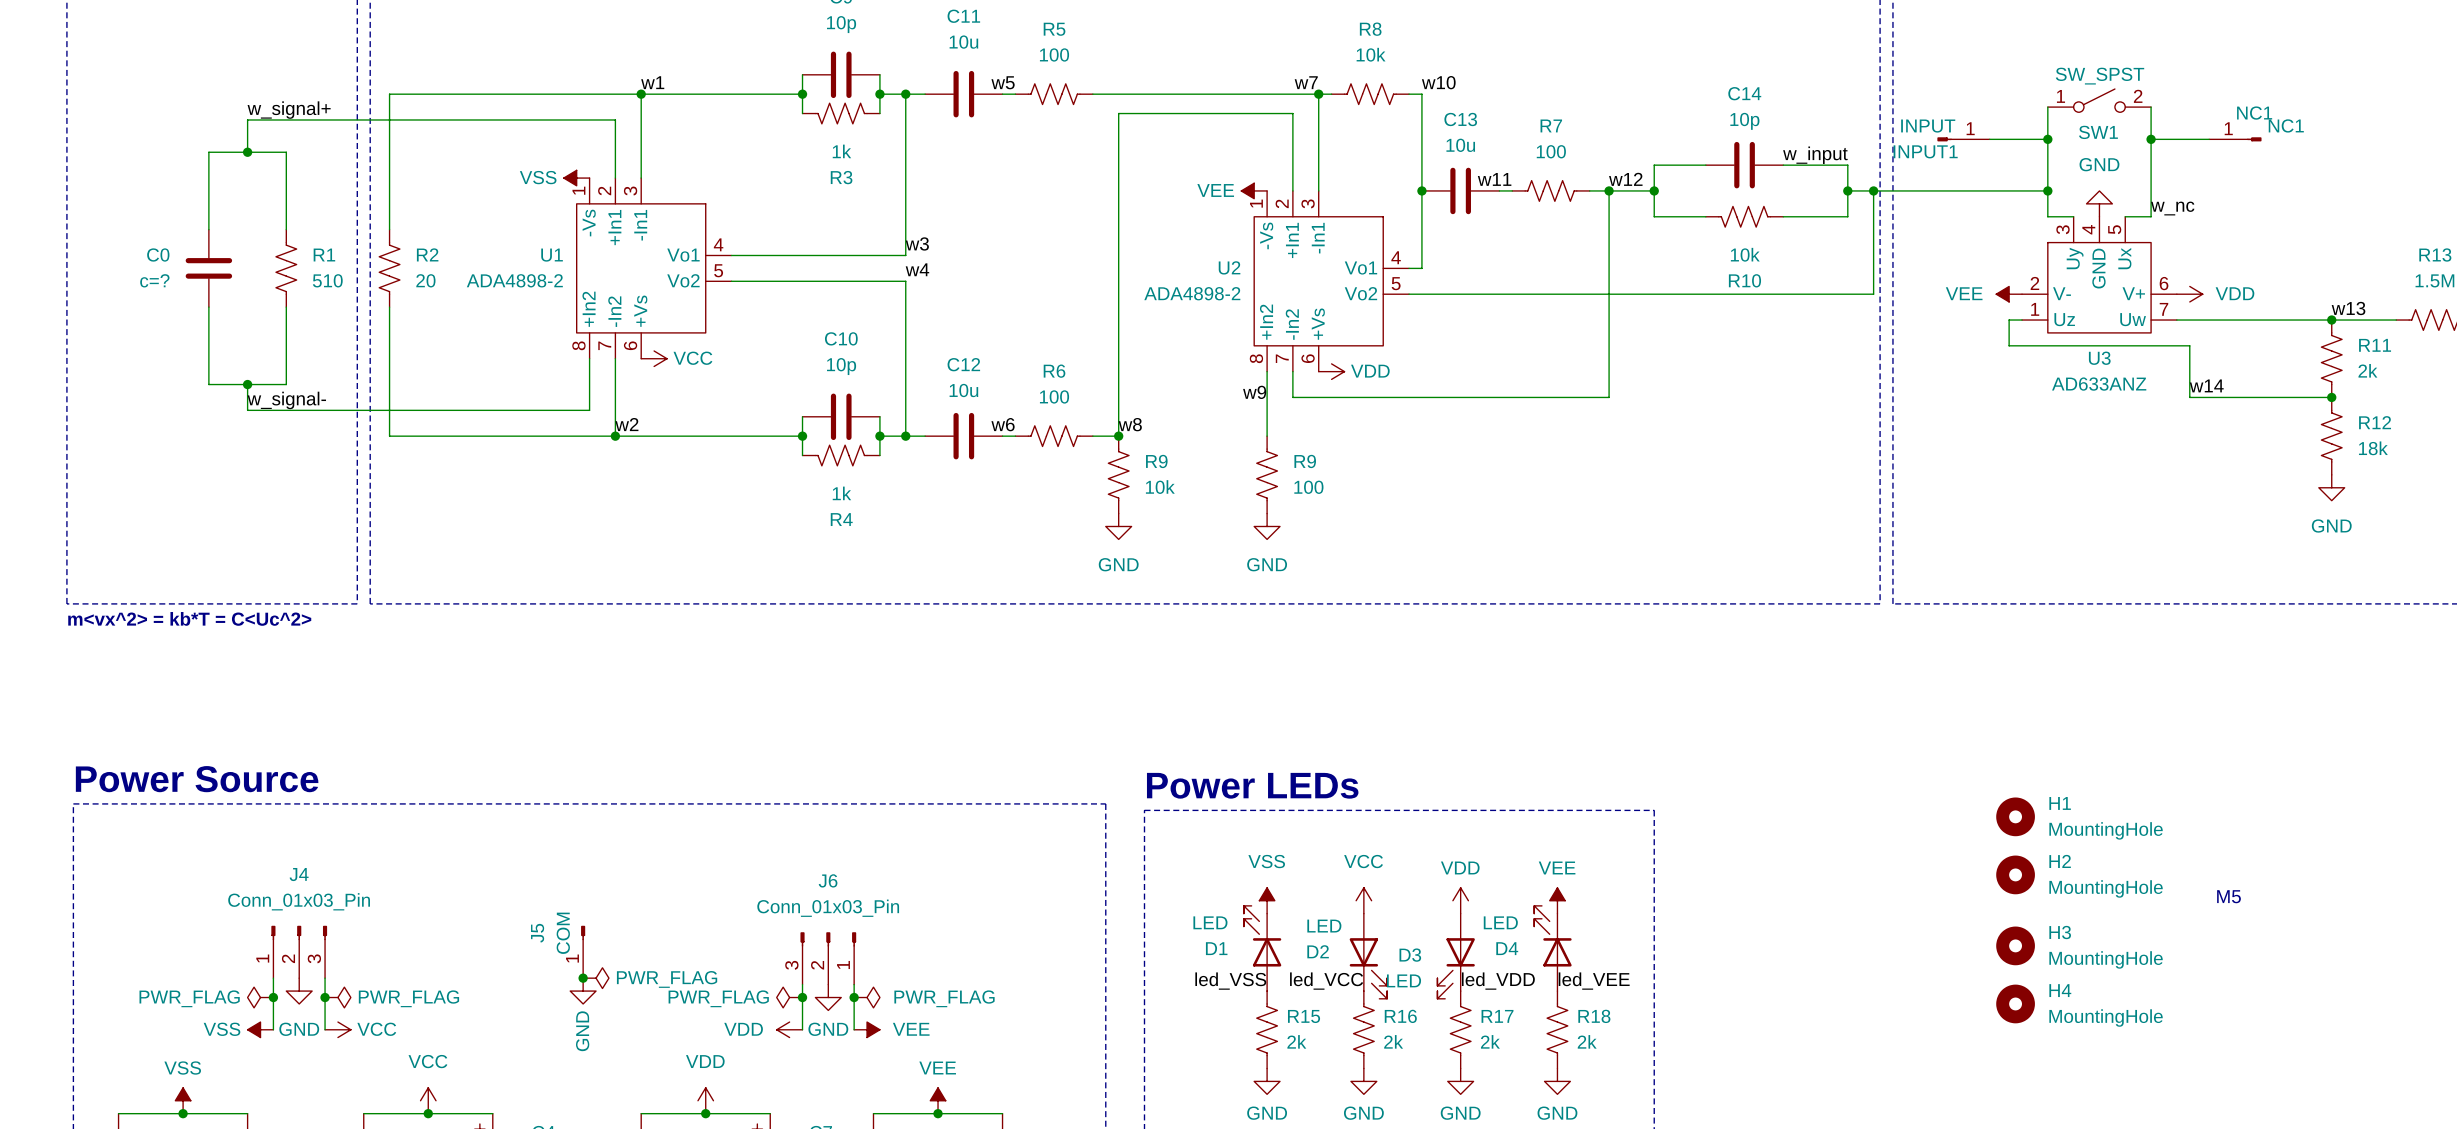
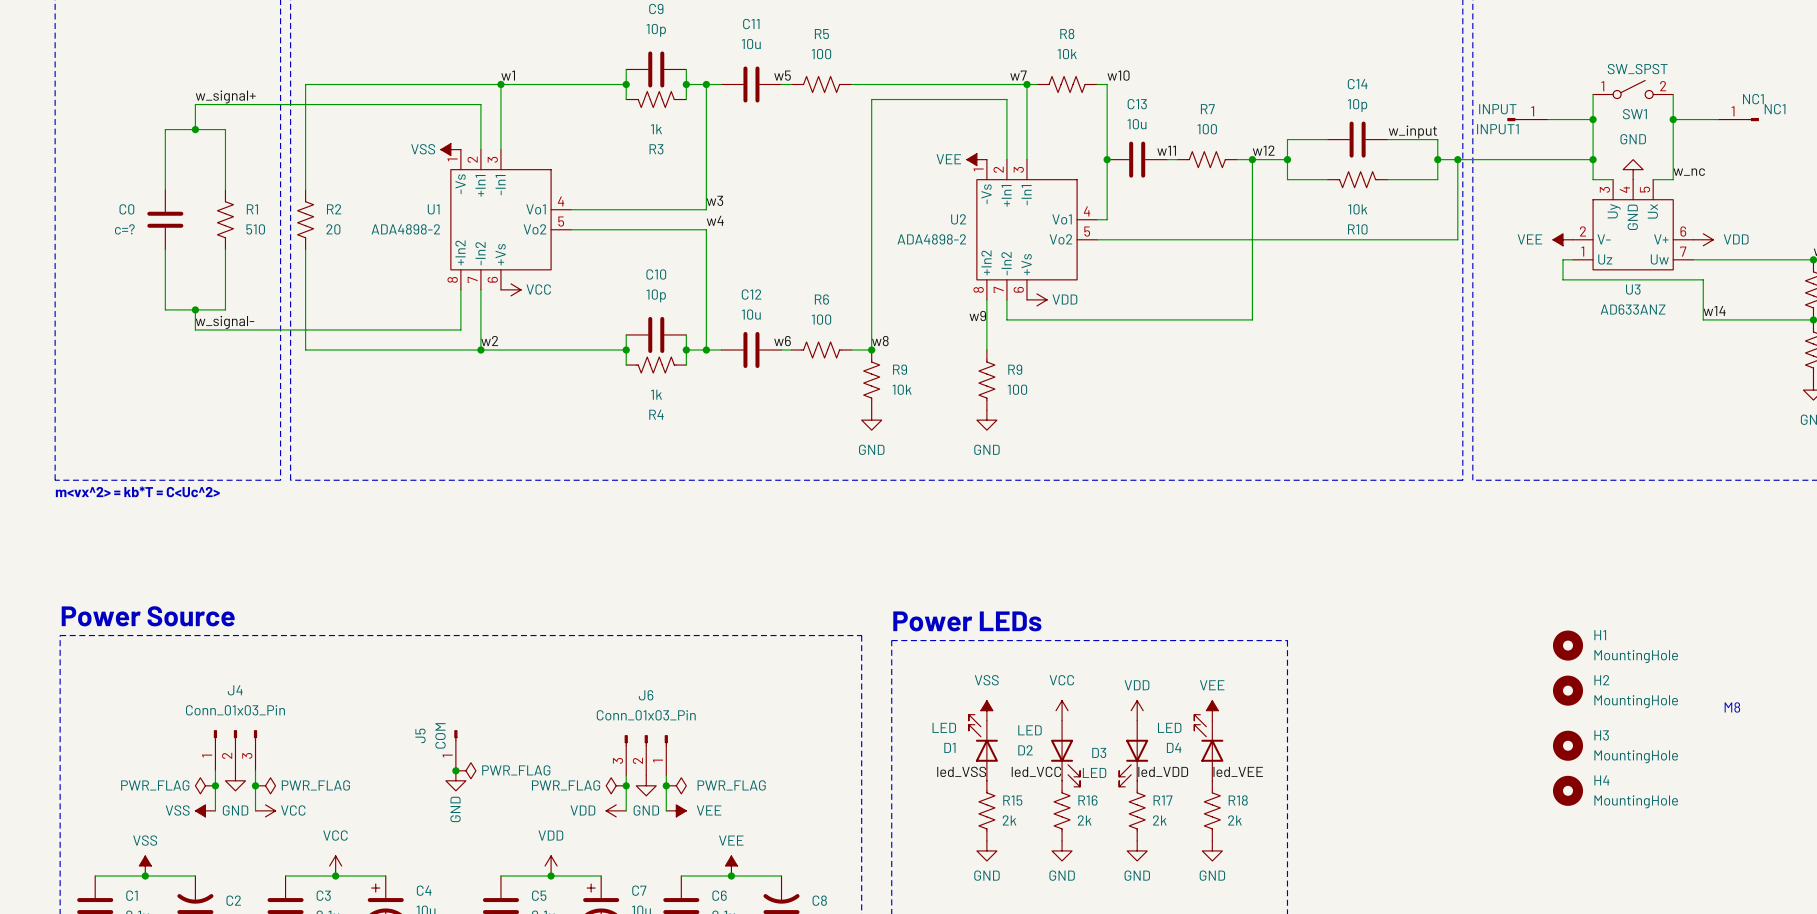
text: M5 (2229, 896) -> M8 (1732, 707)

